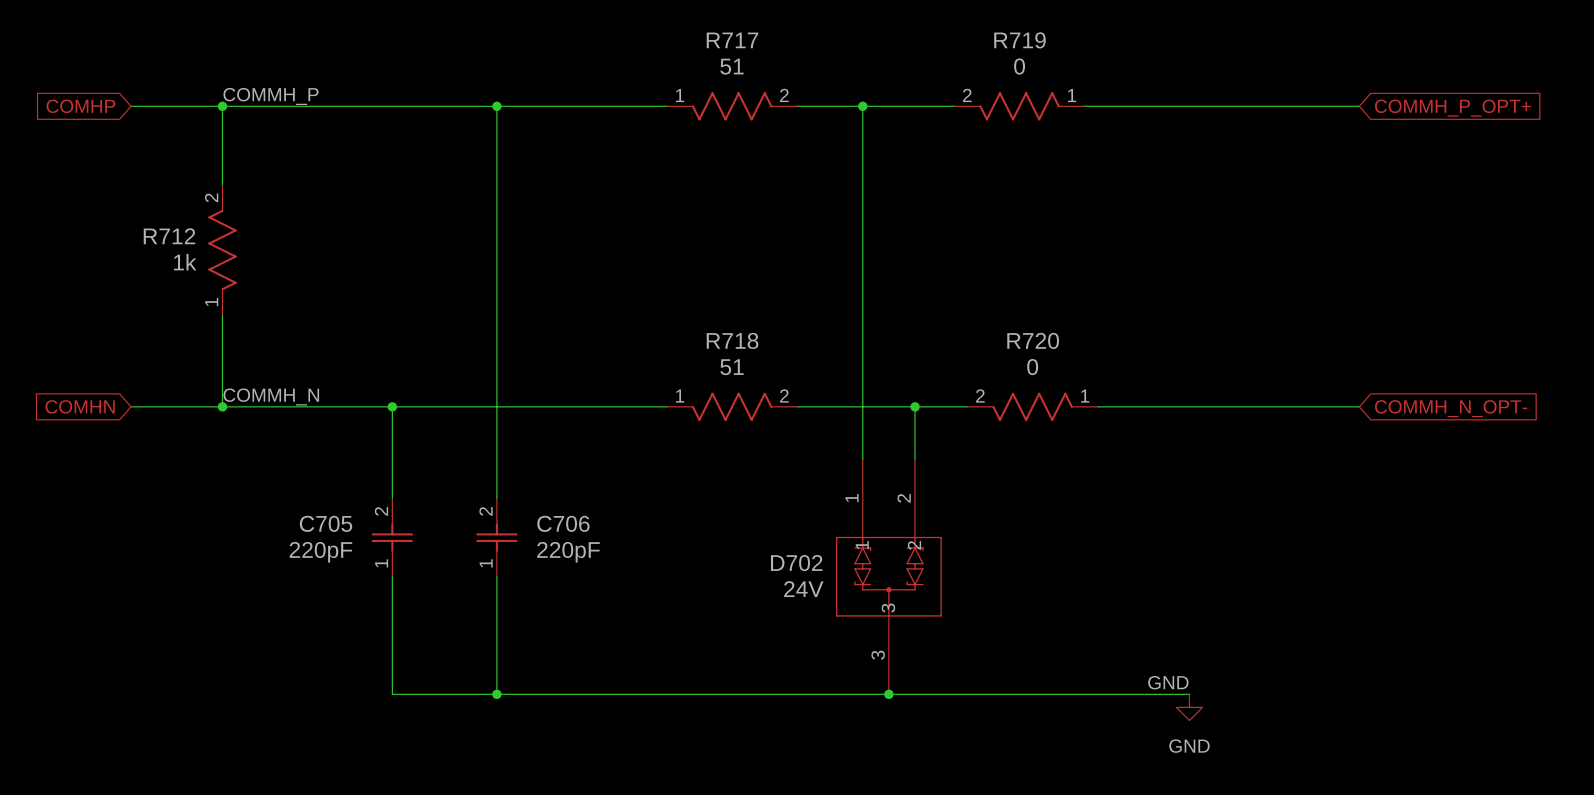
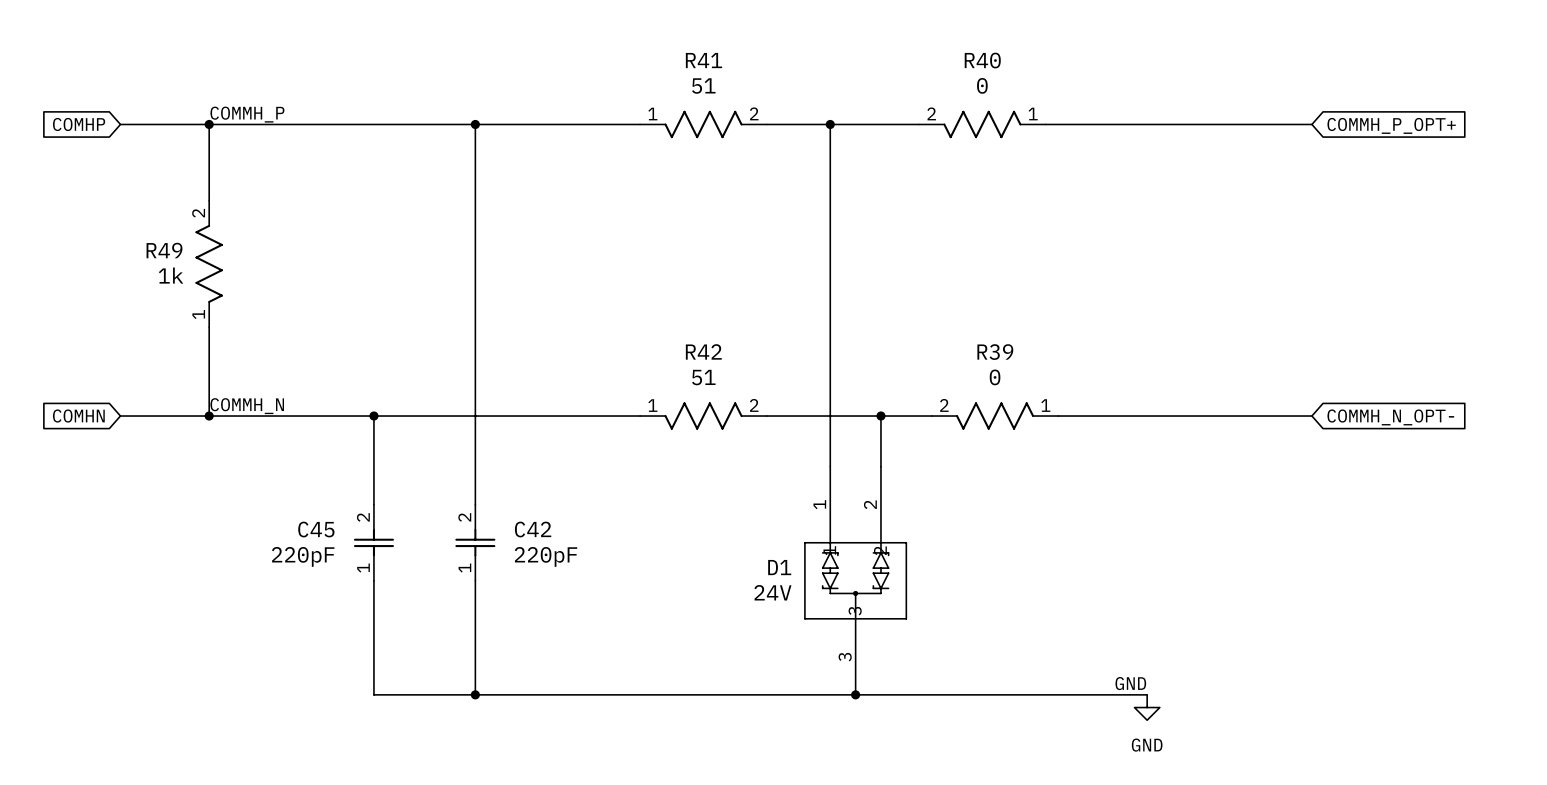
R717 name: R717 (732, 40) -> R41 (703, 60)
R719 name: R719 (1019, 40) -> R40 (982, 60)
R712 name: R712 (169, 236) -> R49 (164, 250)
R718 name: R718 (732, 340) -> R42 (703, 351)
R720 name: R720 (1033, 340) -> R39 (995, 352)
C705 name: C705 (326, 523) -> C45 (316, 529)
C706 name: C706 (563, 523) -> C42 (533, 529)
D702 name: D702 (796, 563) -> D1 (779, 567)

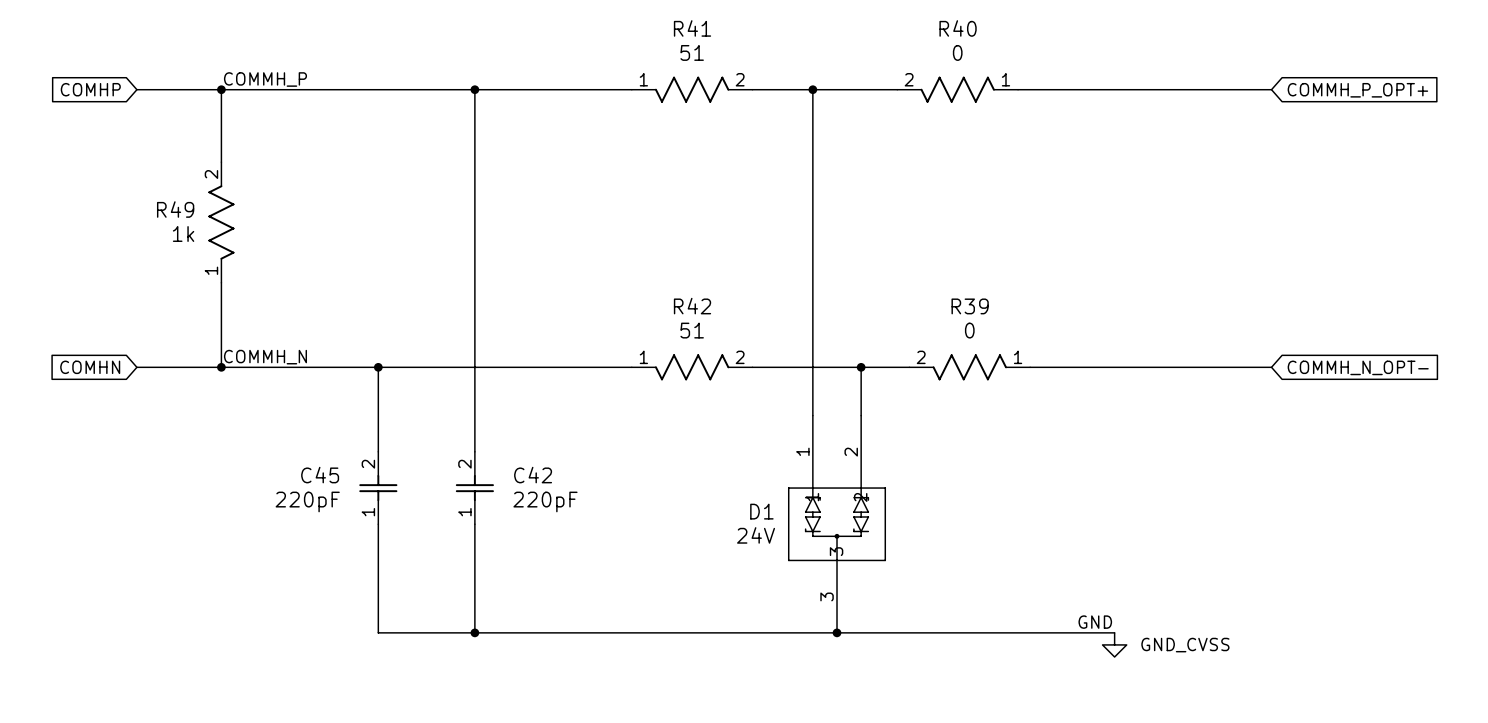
power symbol: GND (1147, 707) -> GND_CVSS (1114, 644)

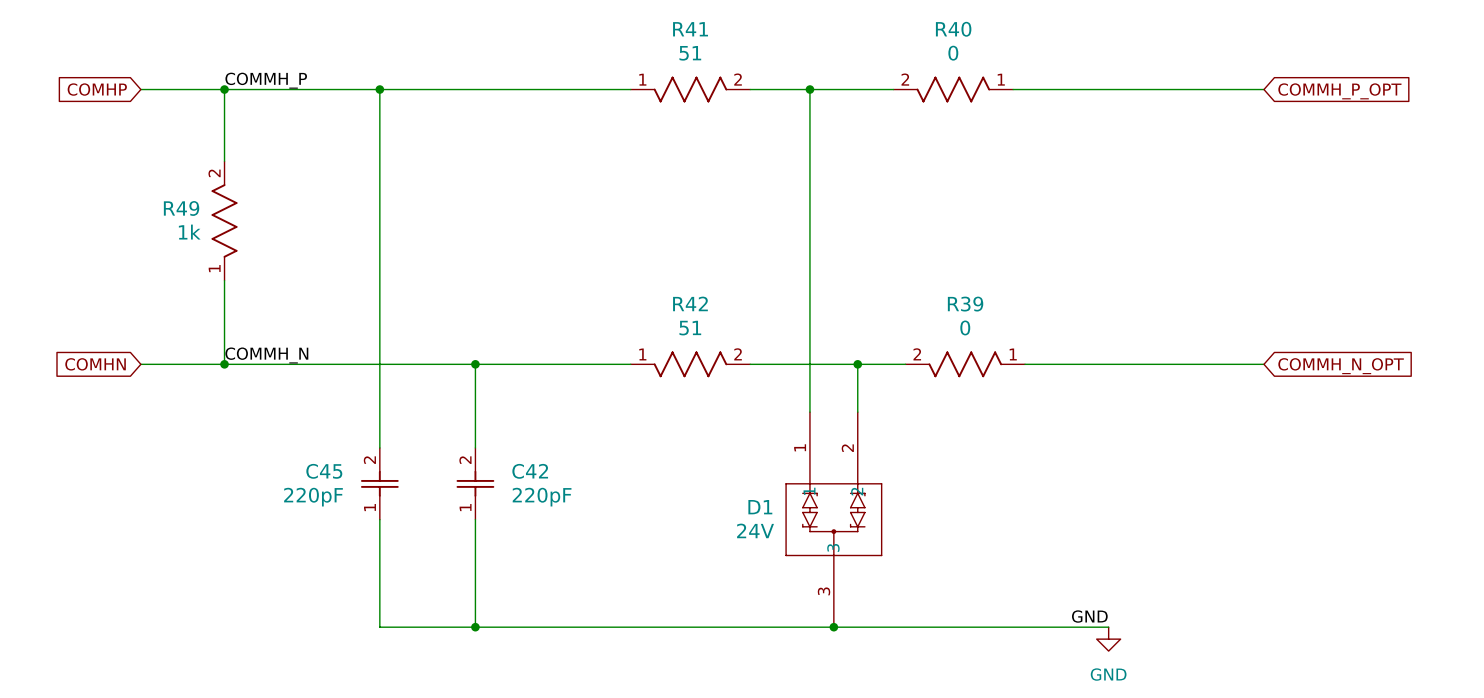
junction: none -> (379, 89)
wire: (474, 89) (474, 367) -> (379, 89) (379, 364)
junction: (474, 89) -> none
global label: COMMH_P_OPT+ (1357, 90) -> COMMH_P_OPT (1339, 91)
junction: (378, 367) -> none
junction: none -> (475, 364)
global label: COMMH_N_OPT- (1358, 367) -> COMMH_N_OPT (1341, 366)
power symbol: GND_CVSS (1114, 644) -> GND (1108, 639)

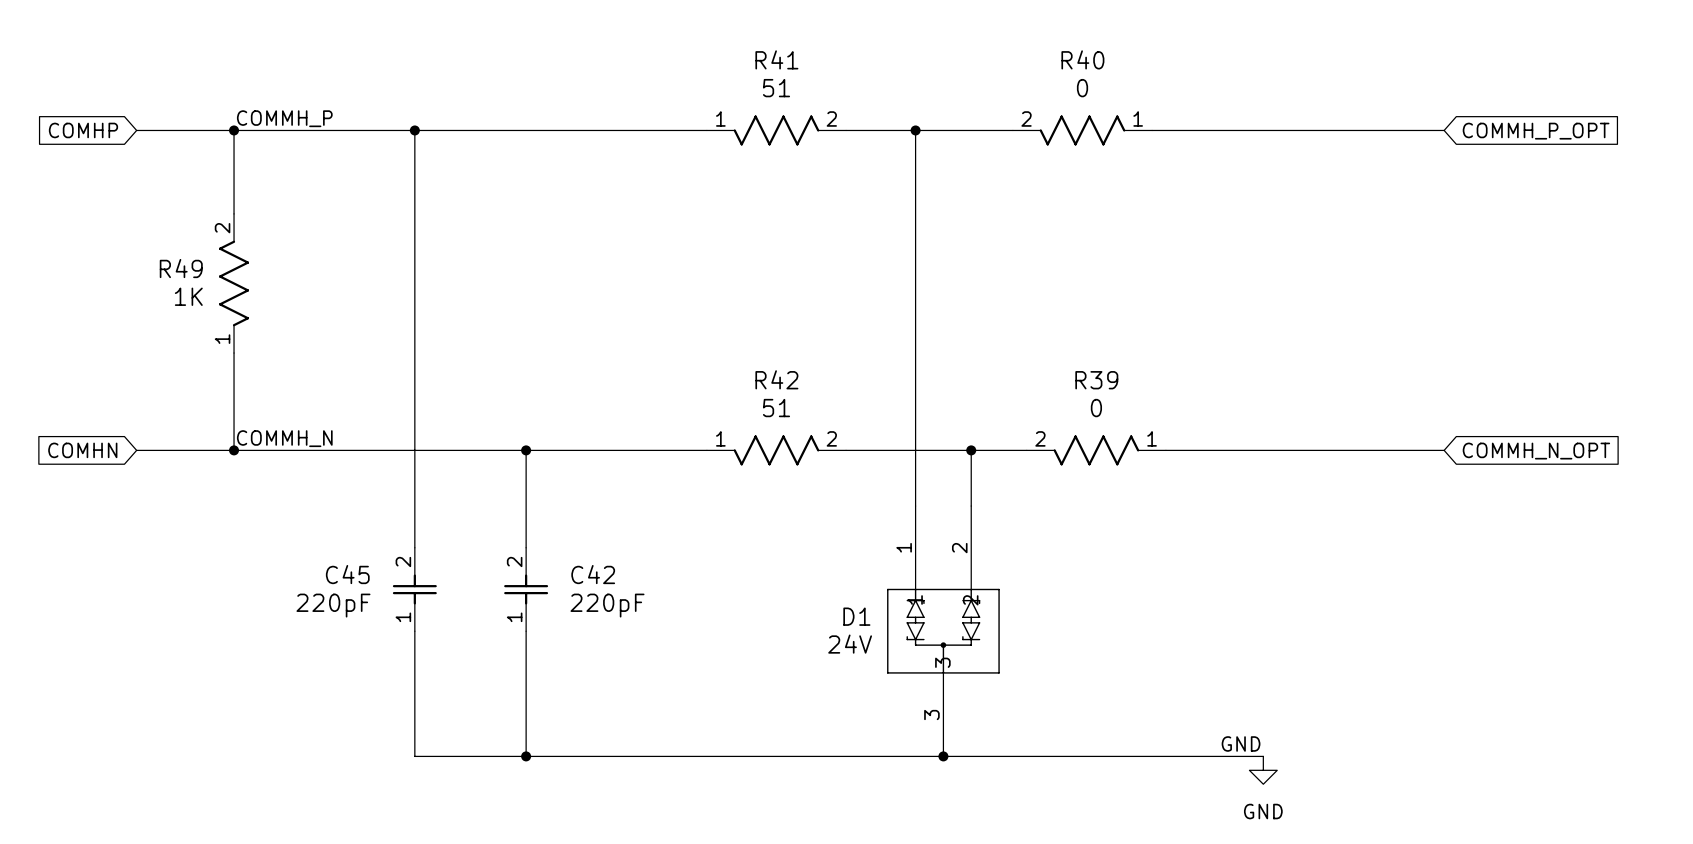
R49 value: 1k (189, 232) -> 1K (188, 296)

